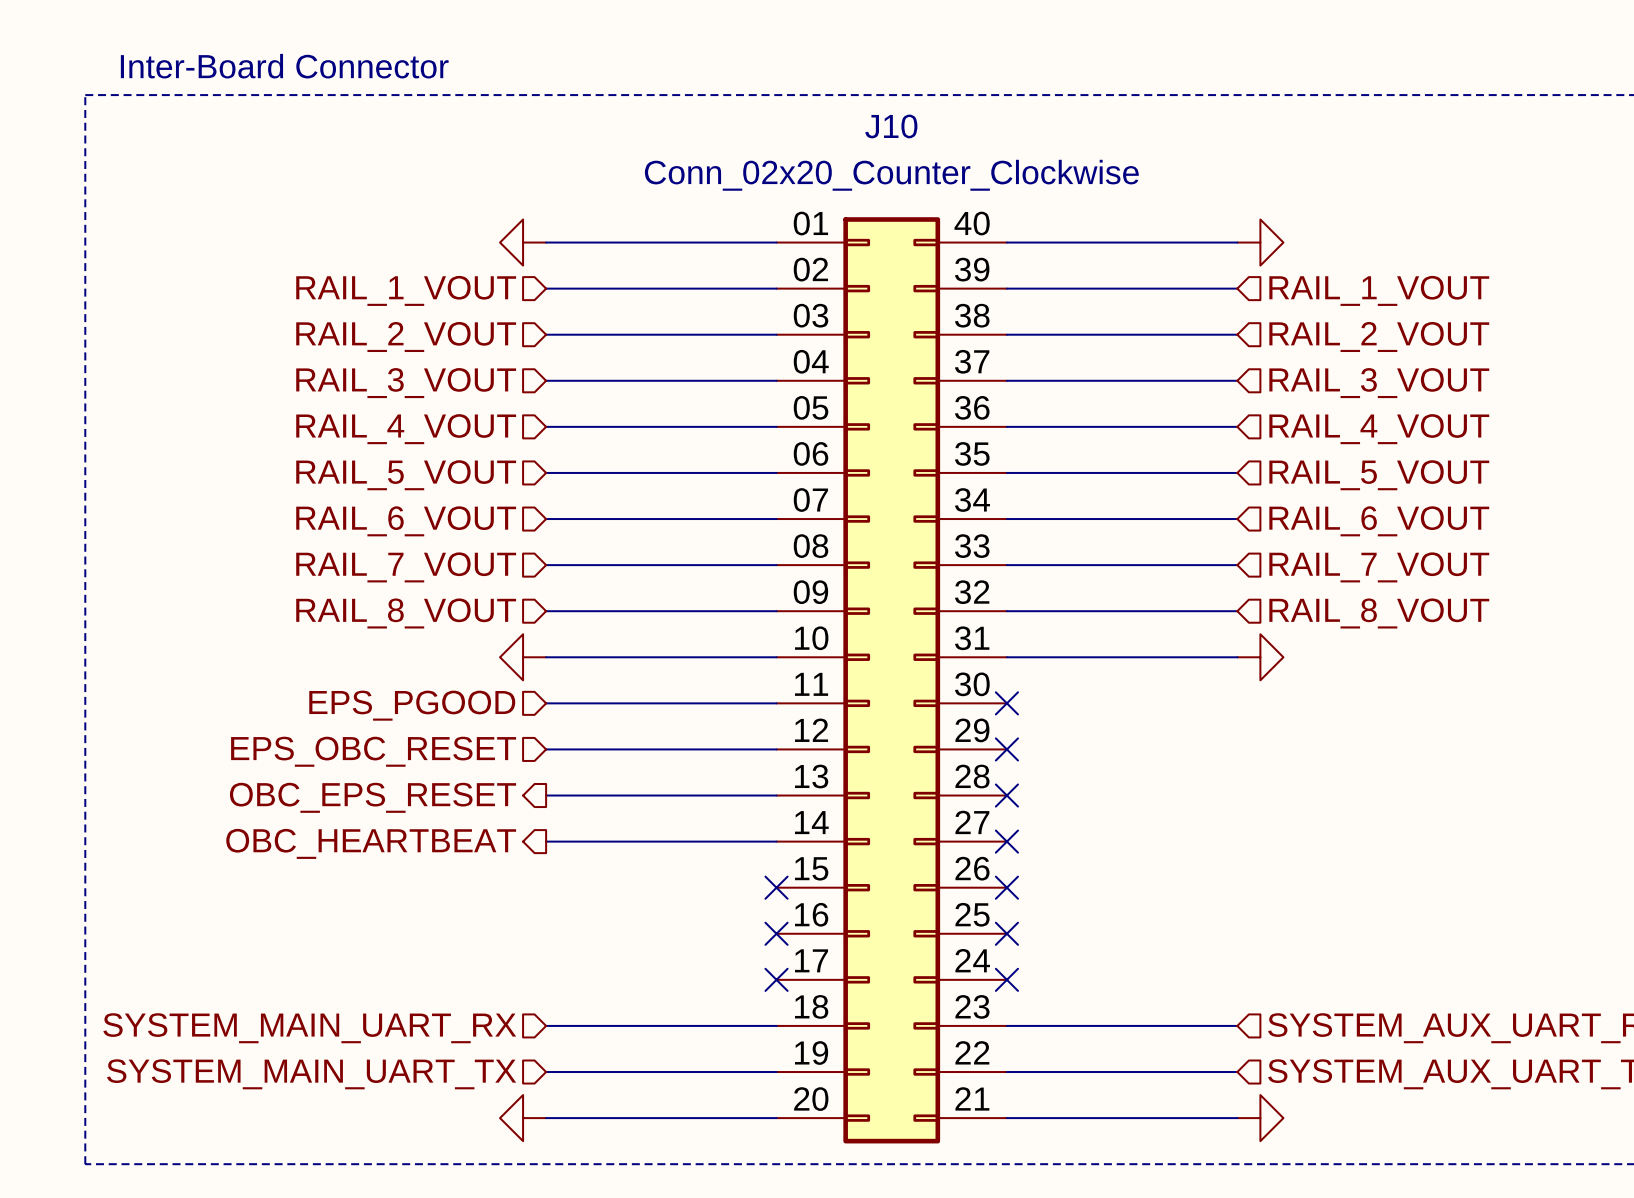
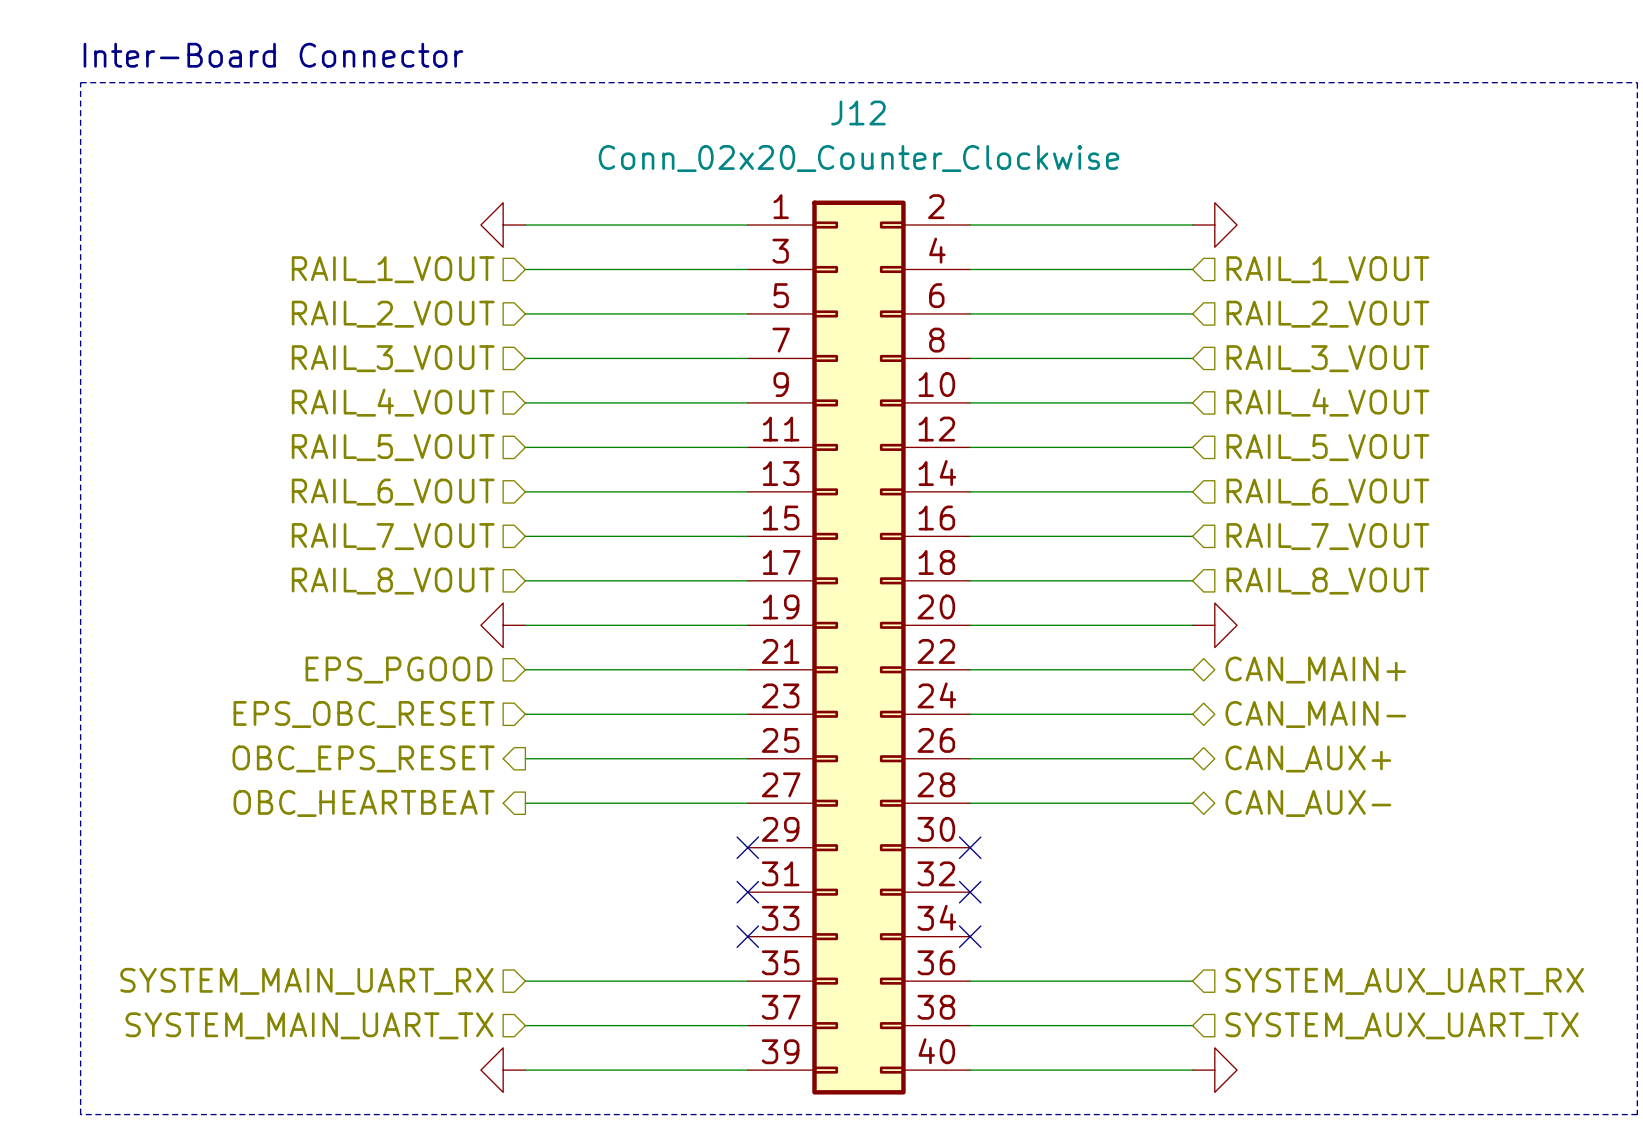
J10 name: J10 (891, 126) -> J12 (858, 112)
J10 symbol: [776, 217, 1007, 1144] -> [747, 200, 971, 1095]
wire: none -> (970, 669) (1192, 669)
no-connect mark: (1006, 703) -> none
hierarchical label: none -> CAN_MAIN+ (1315, 670)
wire: none -> (970, 714) (1192, 714)
no-connect mark: (1006, 749) -> none
hierarchical label: none -> CAN_MAIN- (1315, 714)
wire: none -> (970, 758) (1192, 758)
no-connect mark: (1006, 795) -> none
hierarchical label: none -> CAN_AUX+ (1308, 758)
wire: none -> (970, 803) (1192, 803)
no-connect mark: (1006, 841) -> none
hierarchical label: none -> CAN_AUX- (1308, 803)

